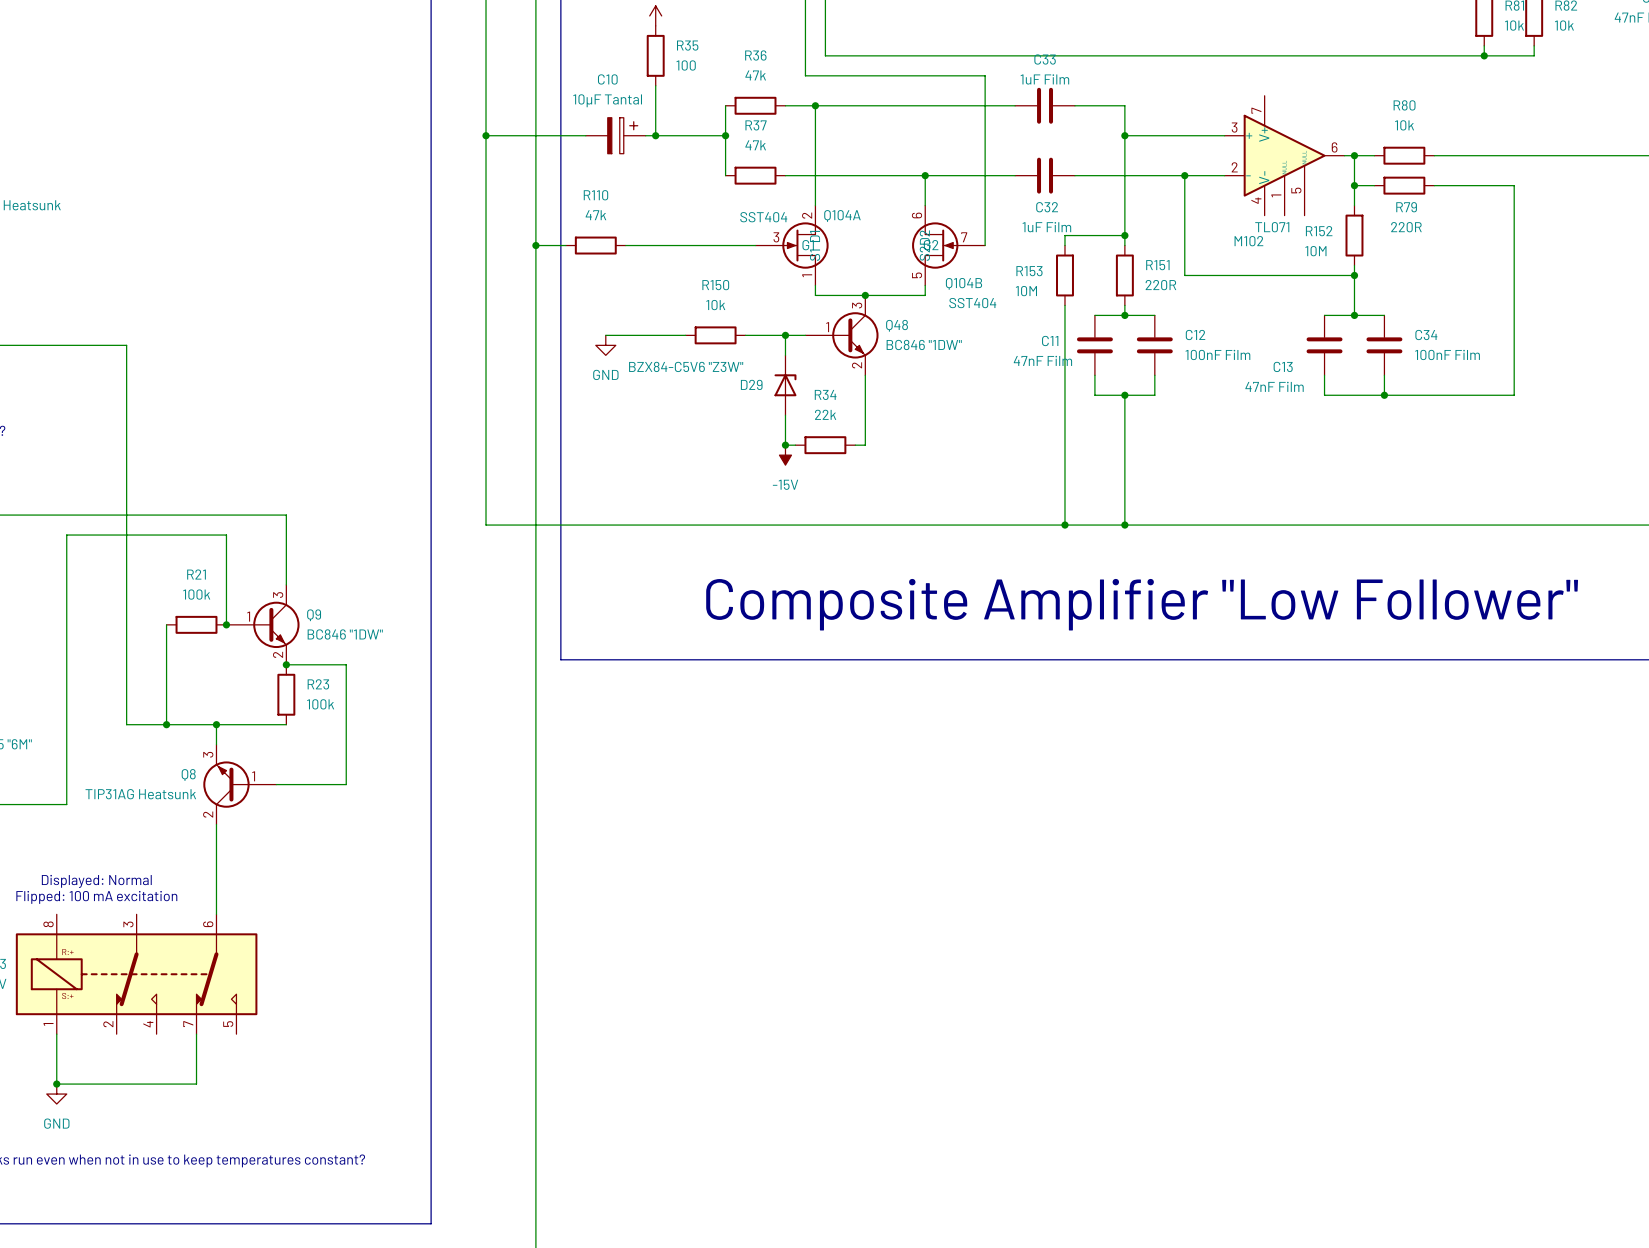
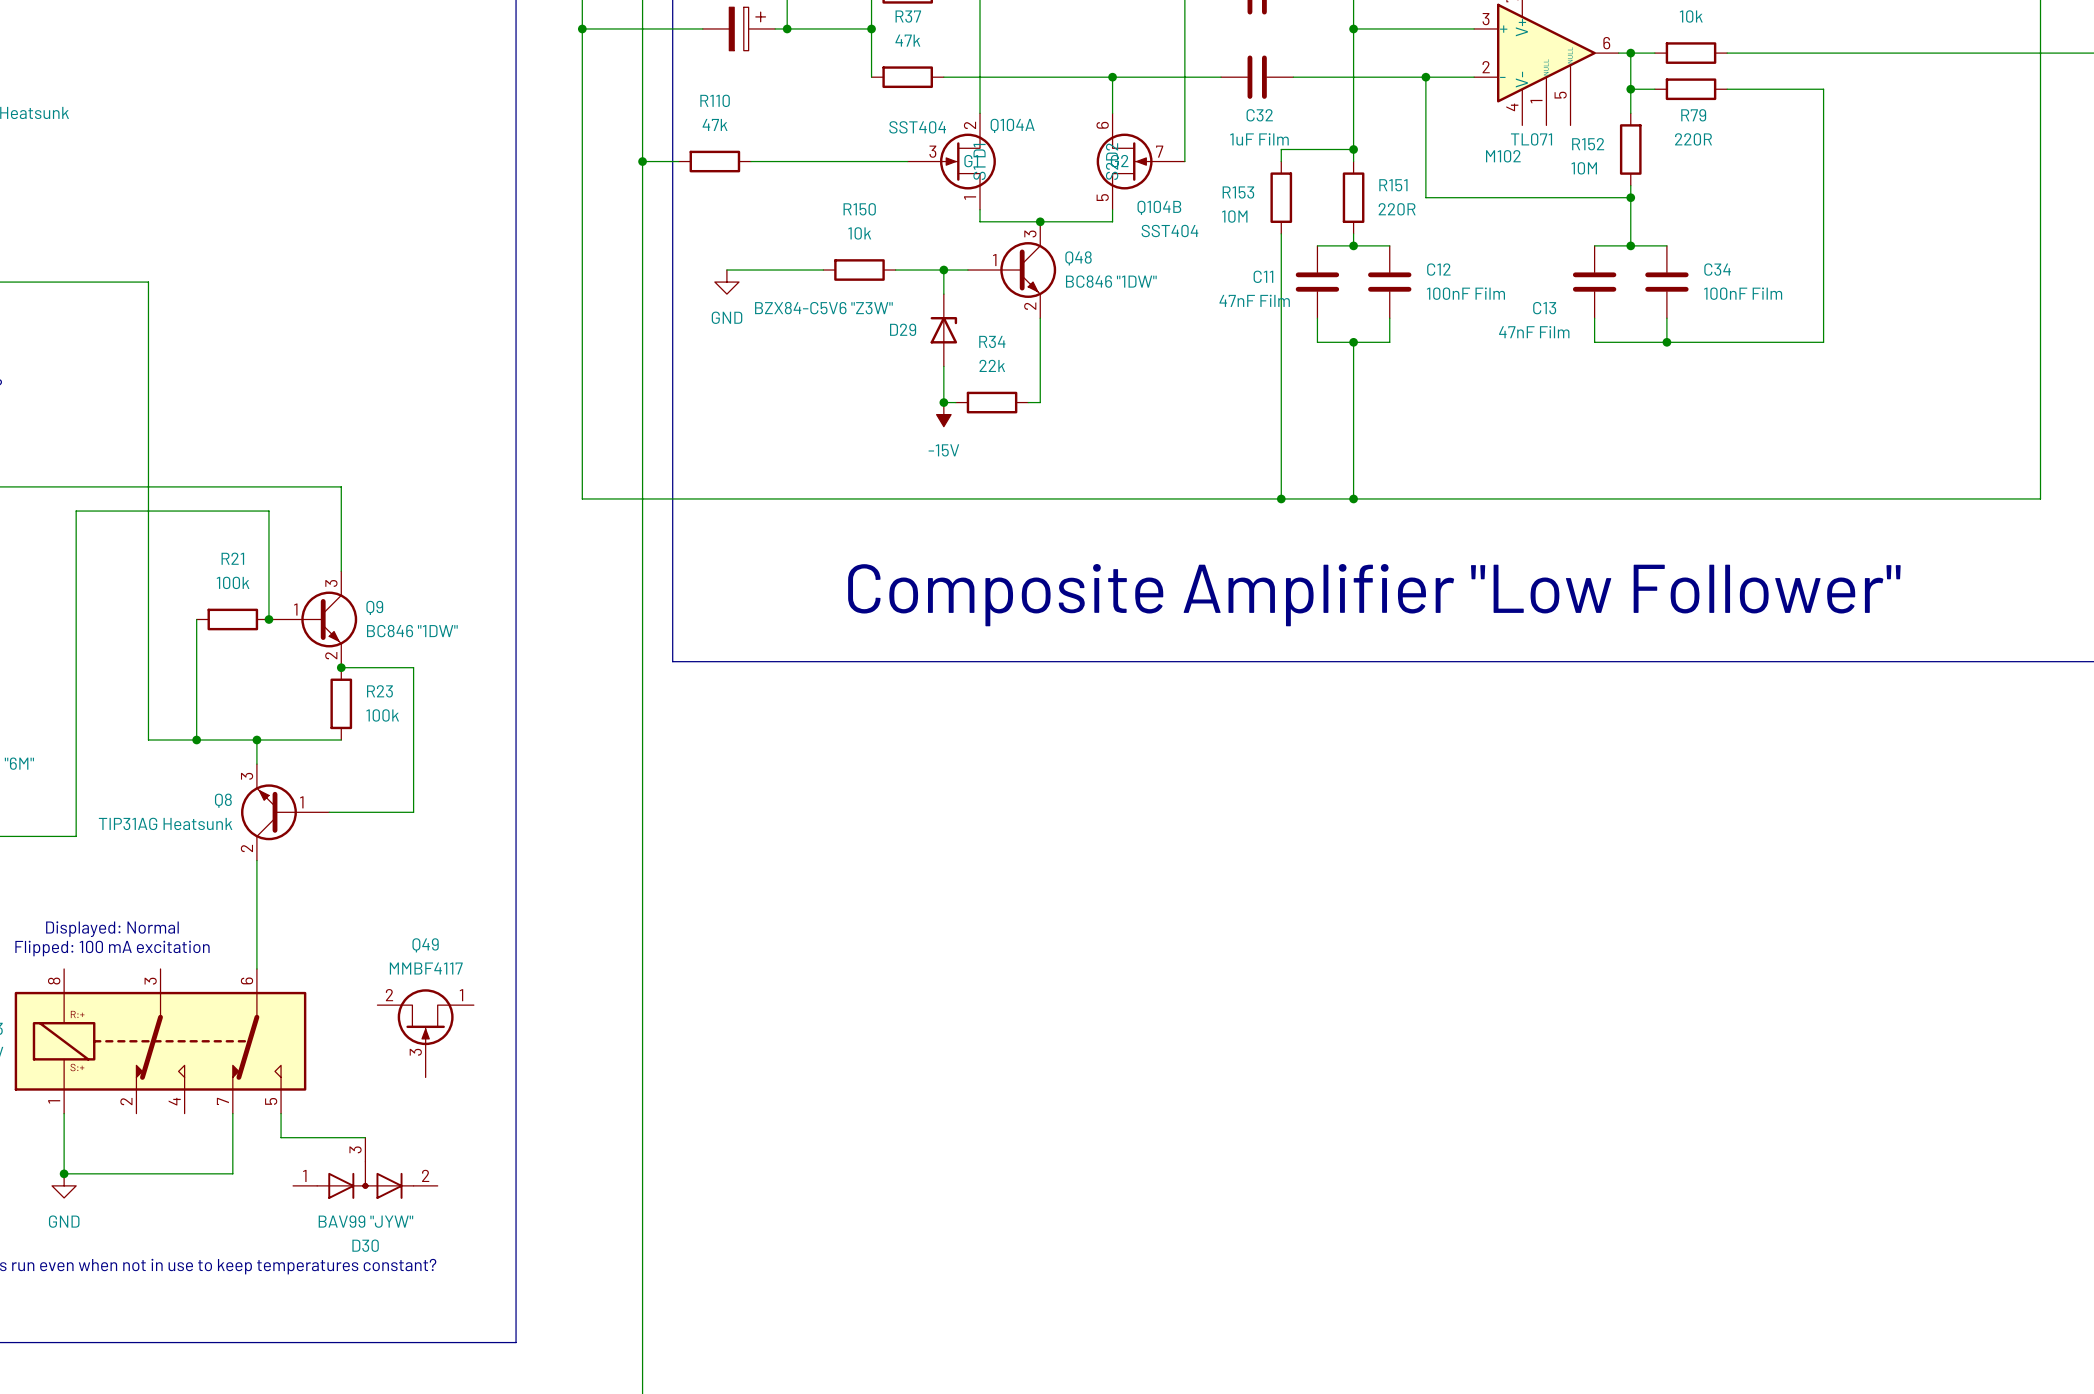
Q49: none -> MMBF4117 (425, 1033)
wire: none -> (281, 1113) (281, 1137) (365, 1137)
D30: none -> BAV99 "JYW" (365, 1168)

